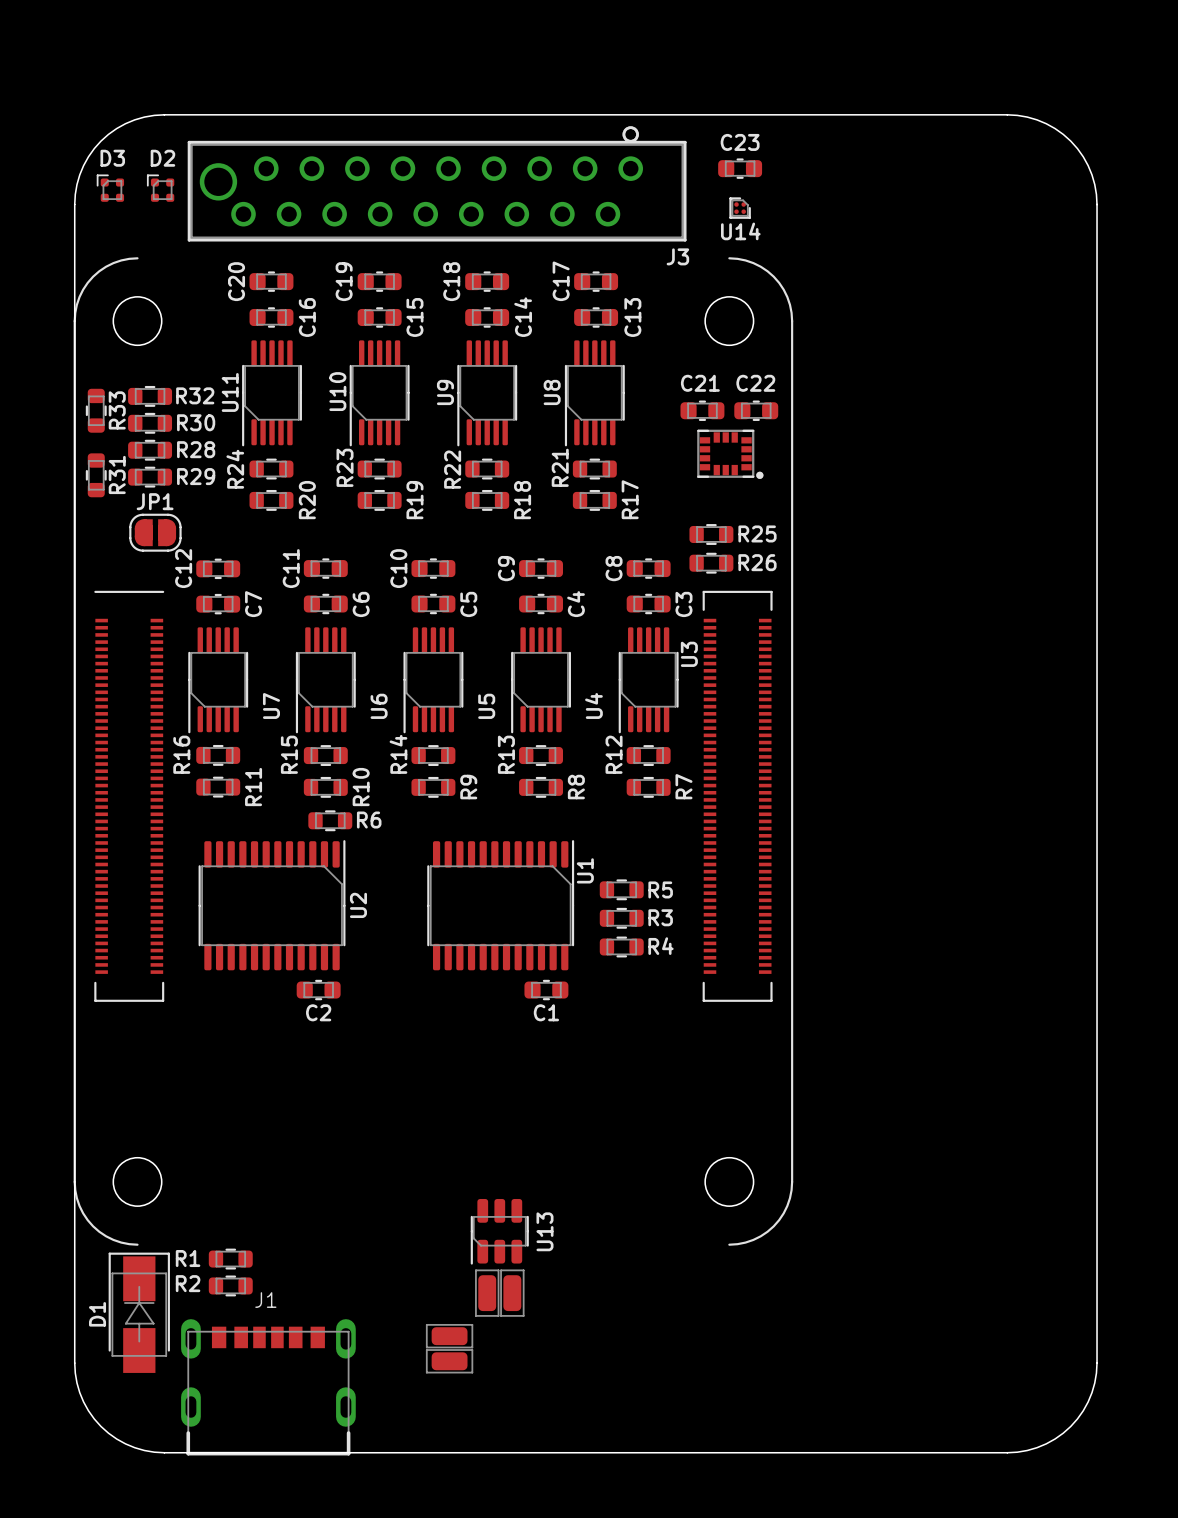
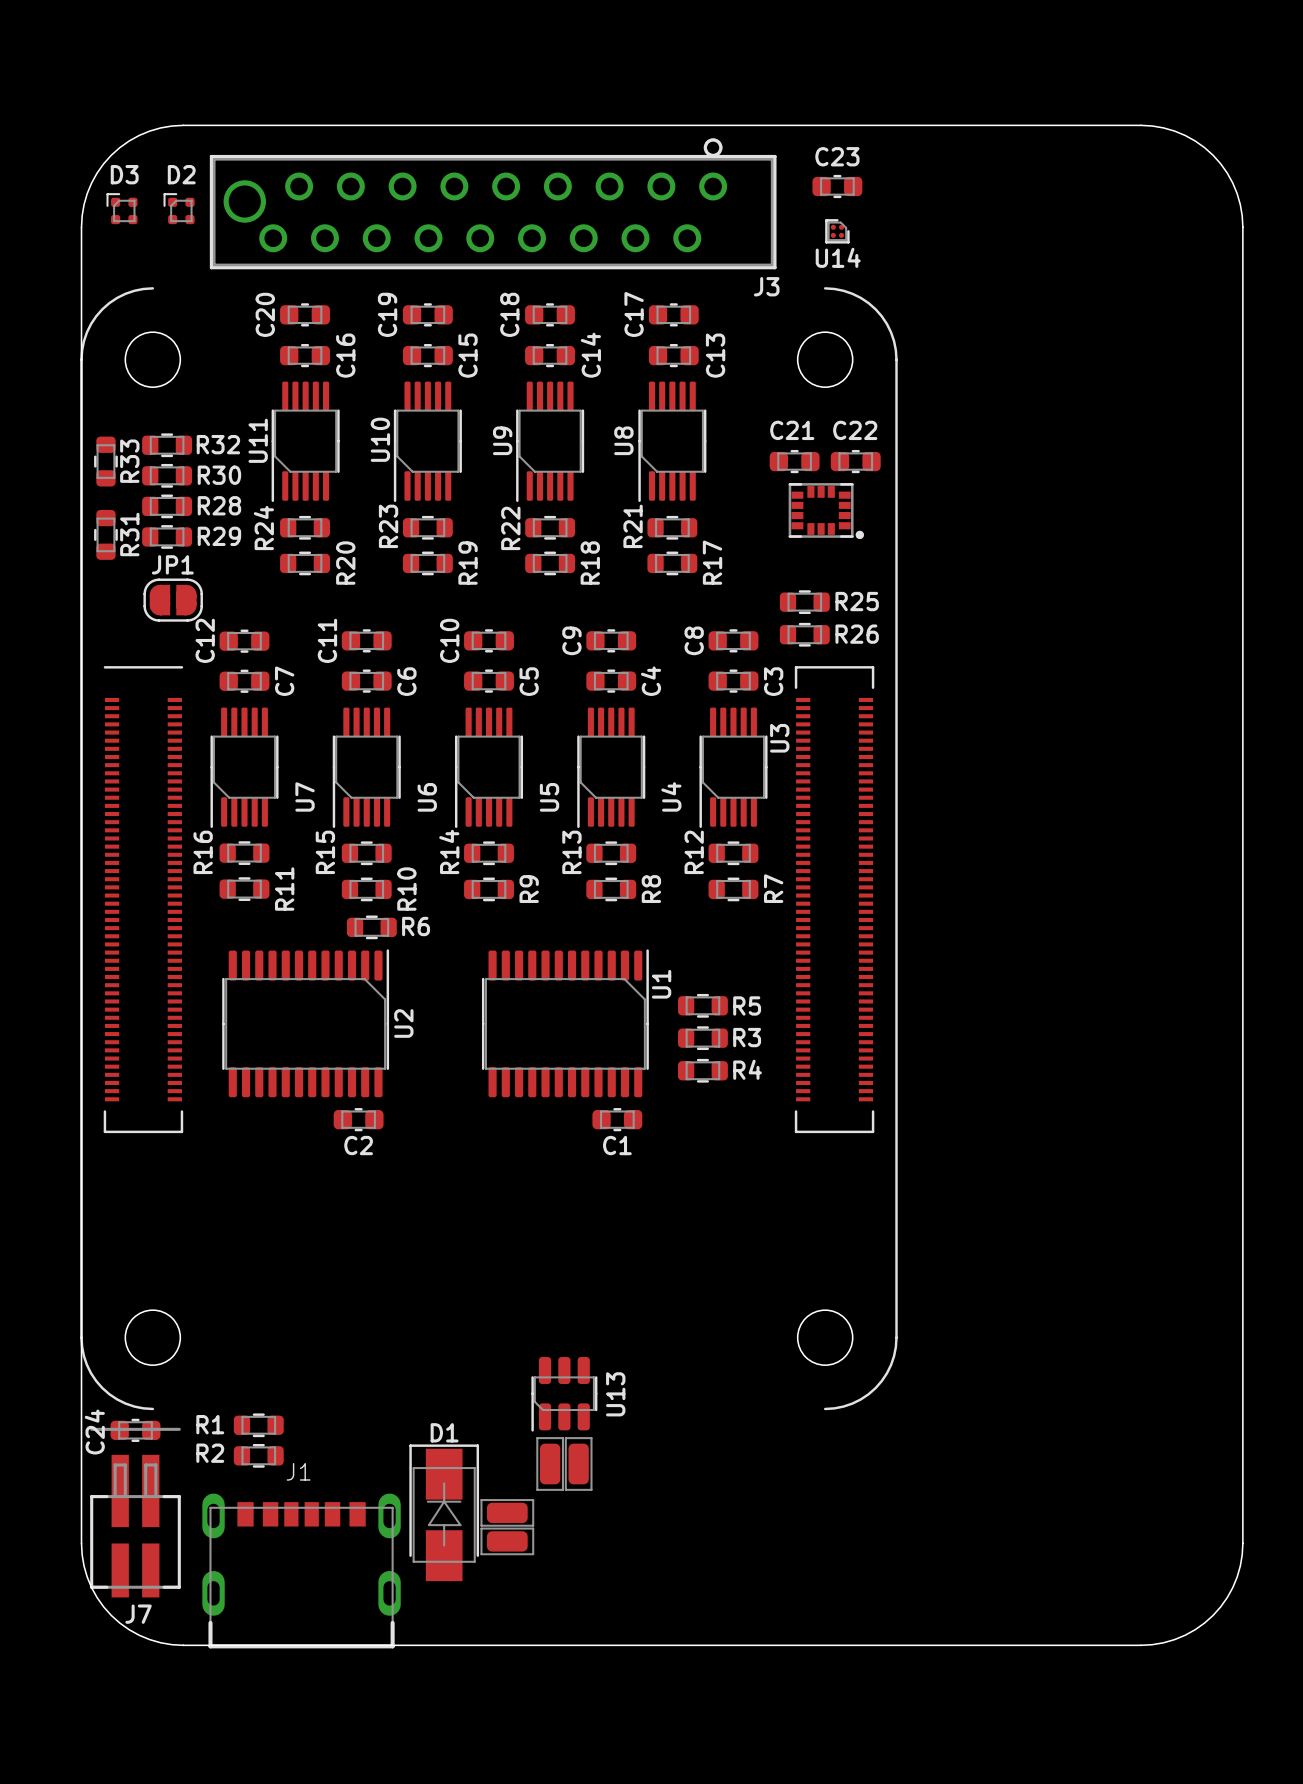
C24: none -> (135, 1430)
D1 position: (139, 1312) -> (444, 1512)
D1 name rotation: 0° (97, 1314) -> 90° clockwise (444, 1432)
D1 name position: D1 (97, 1314) -> D1 (444, 1432)
J7: none -> (135, 1512)

